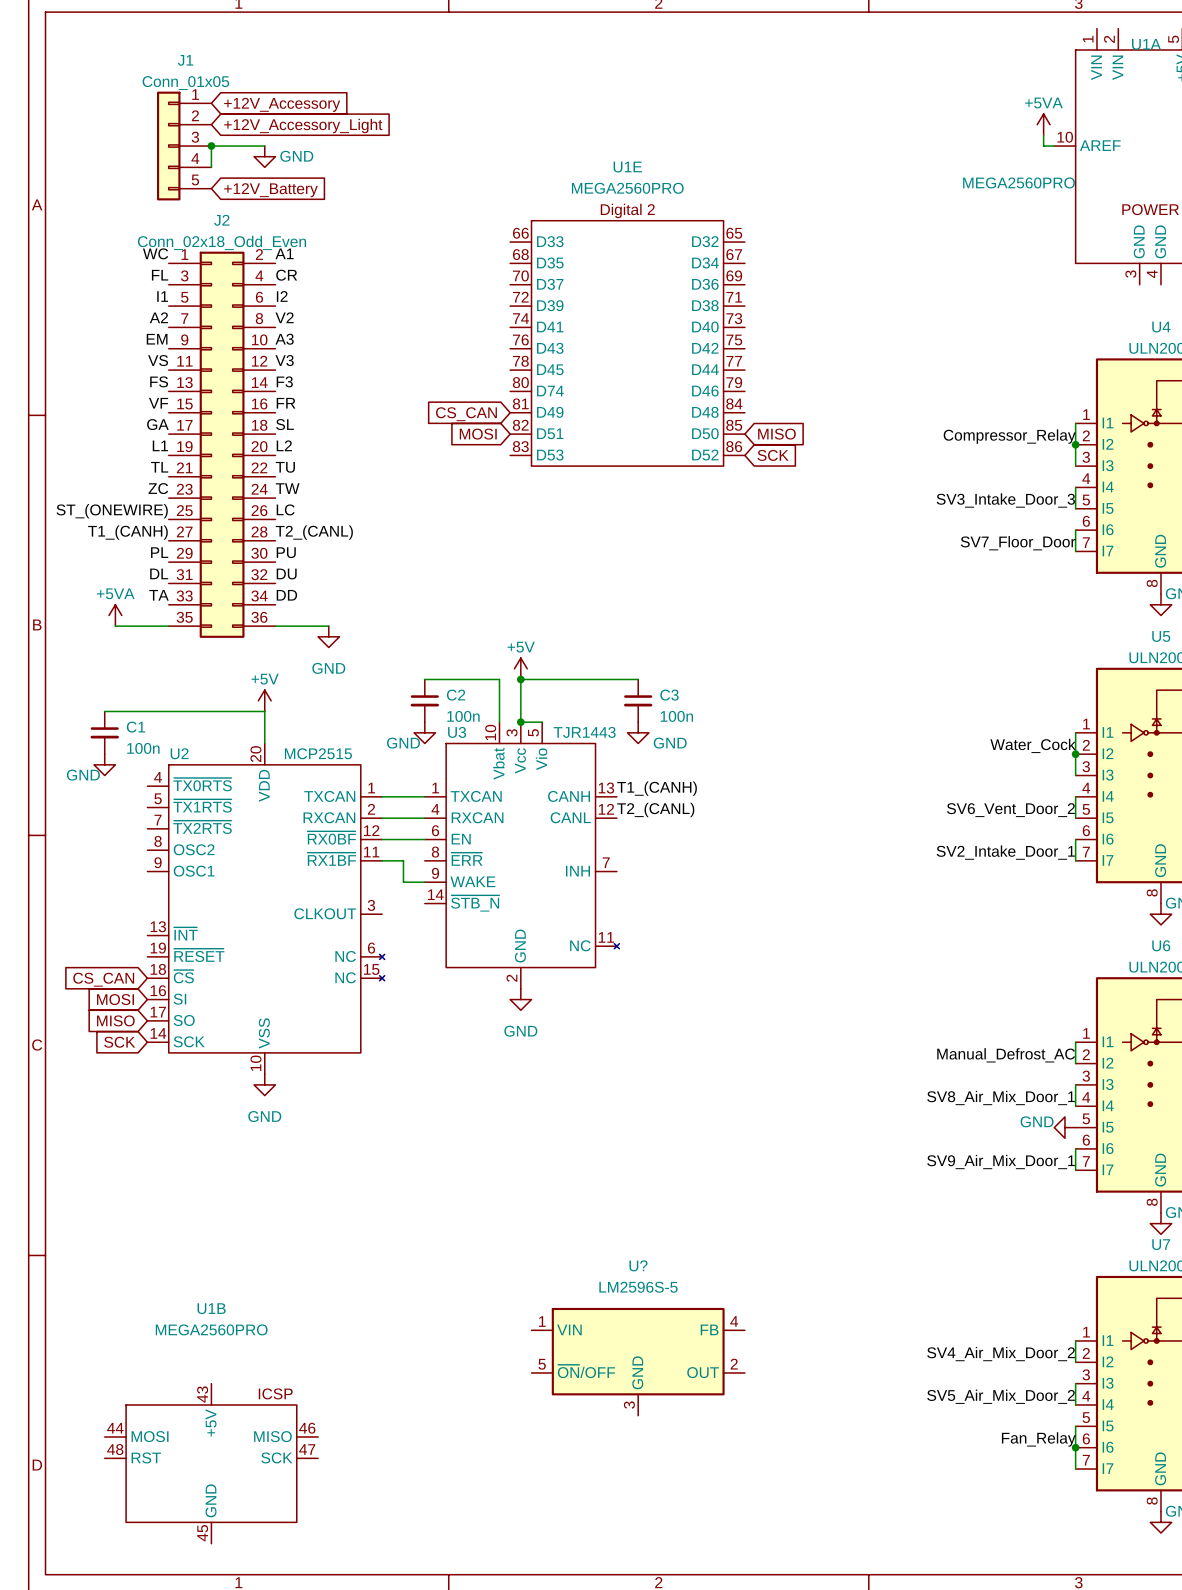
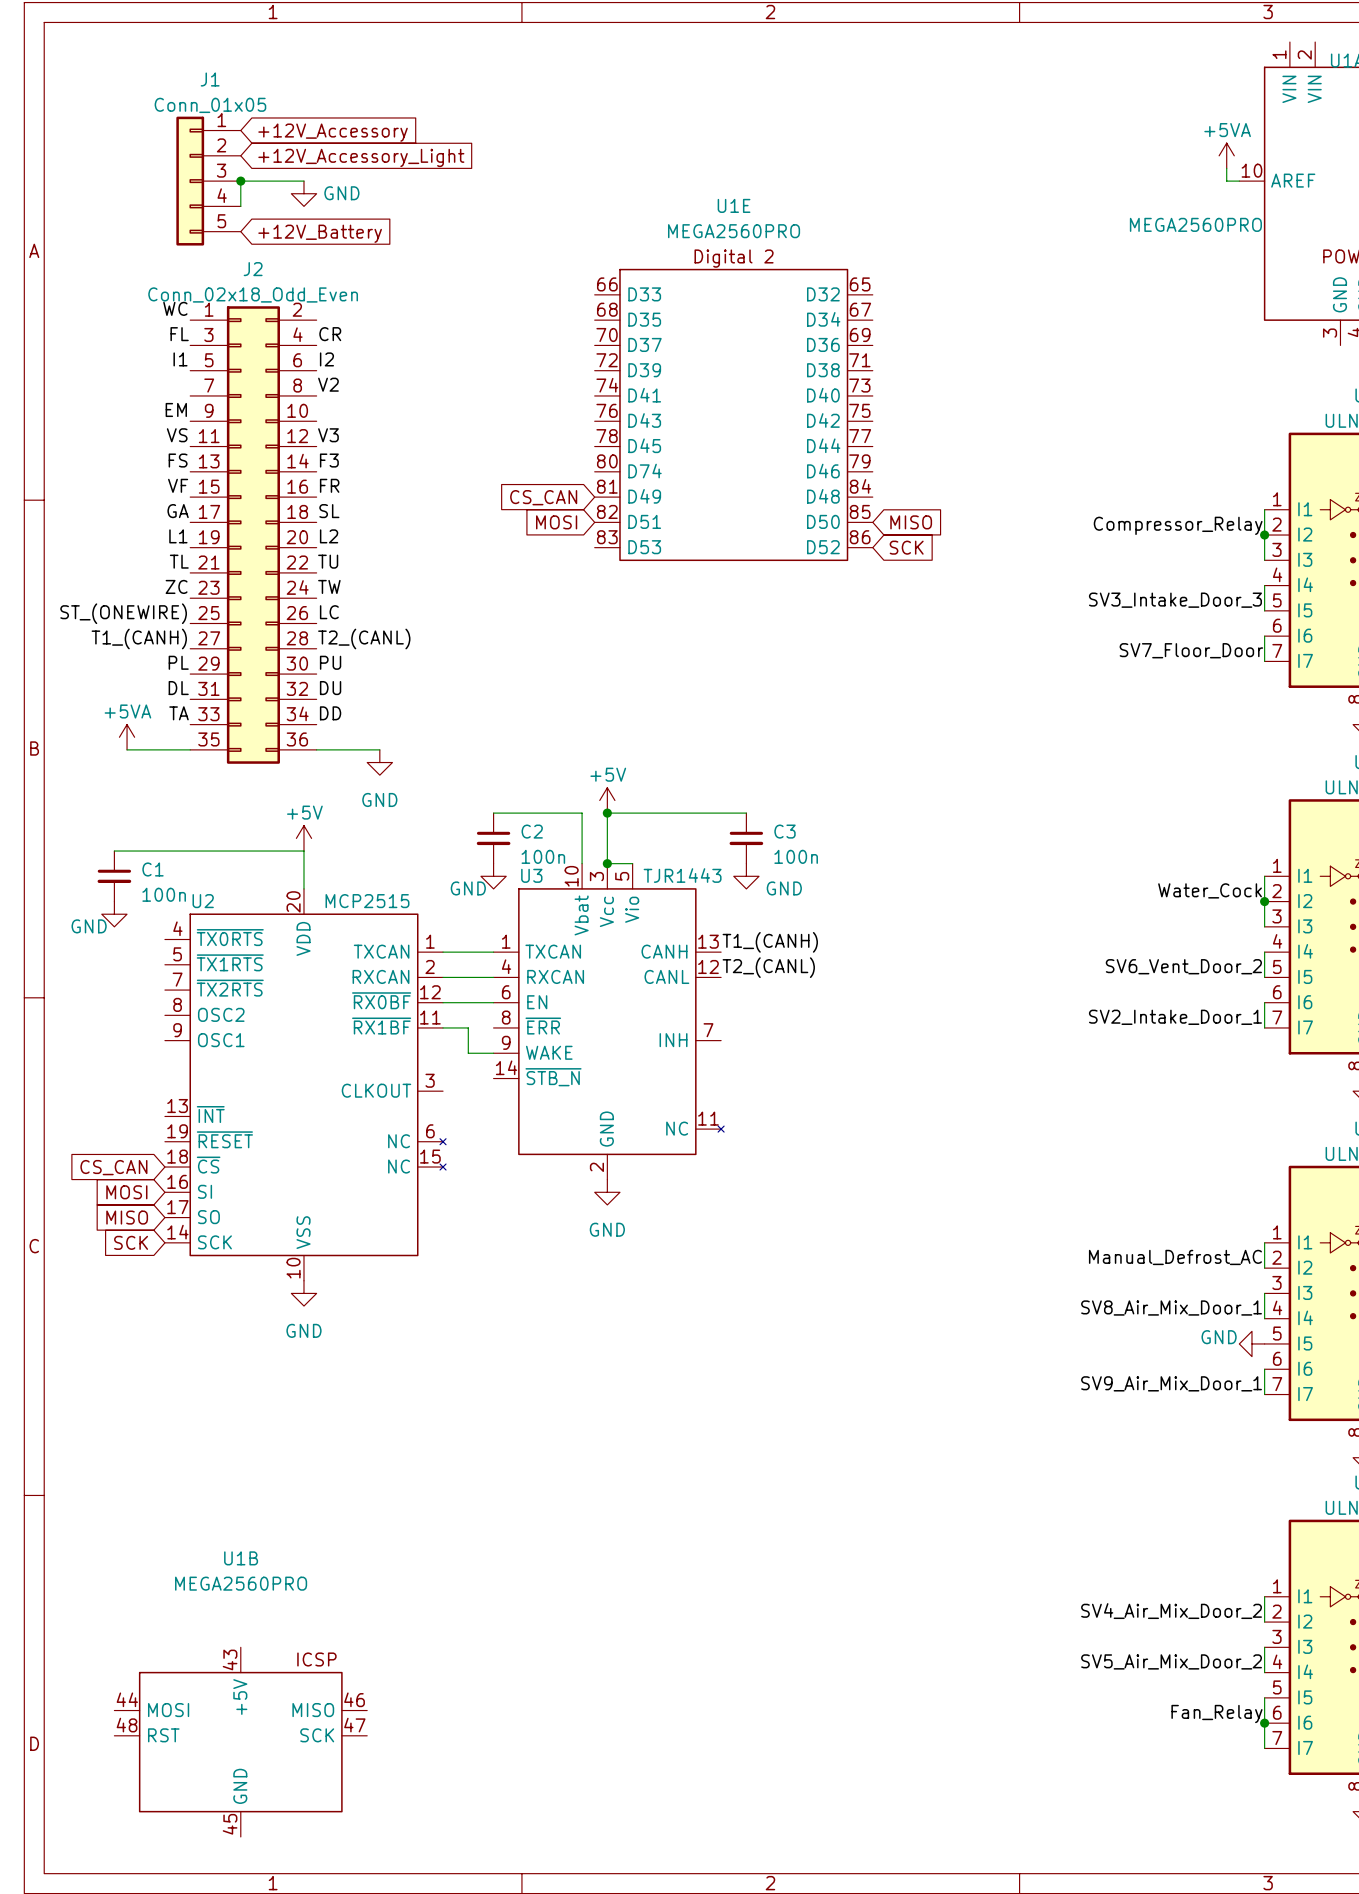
label: A1 (284, 253) -> none
label: A2 (158, 317) -> none
label: A3 (284, 339) -> none
U?: LM2596S-5 (638, 1361) -> none

